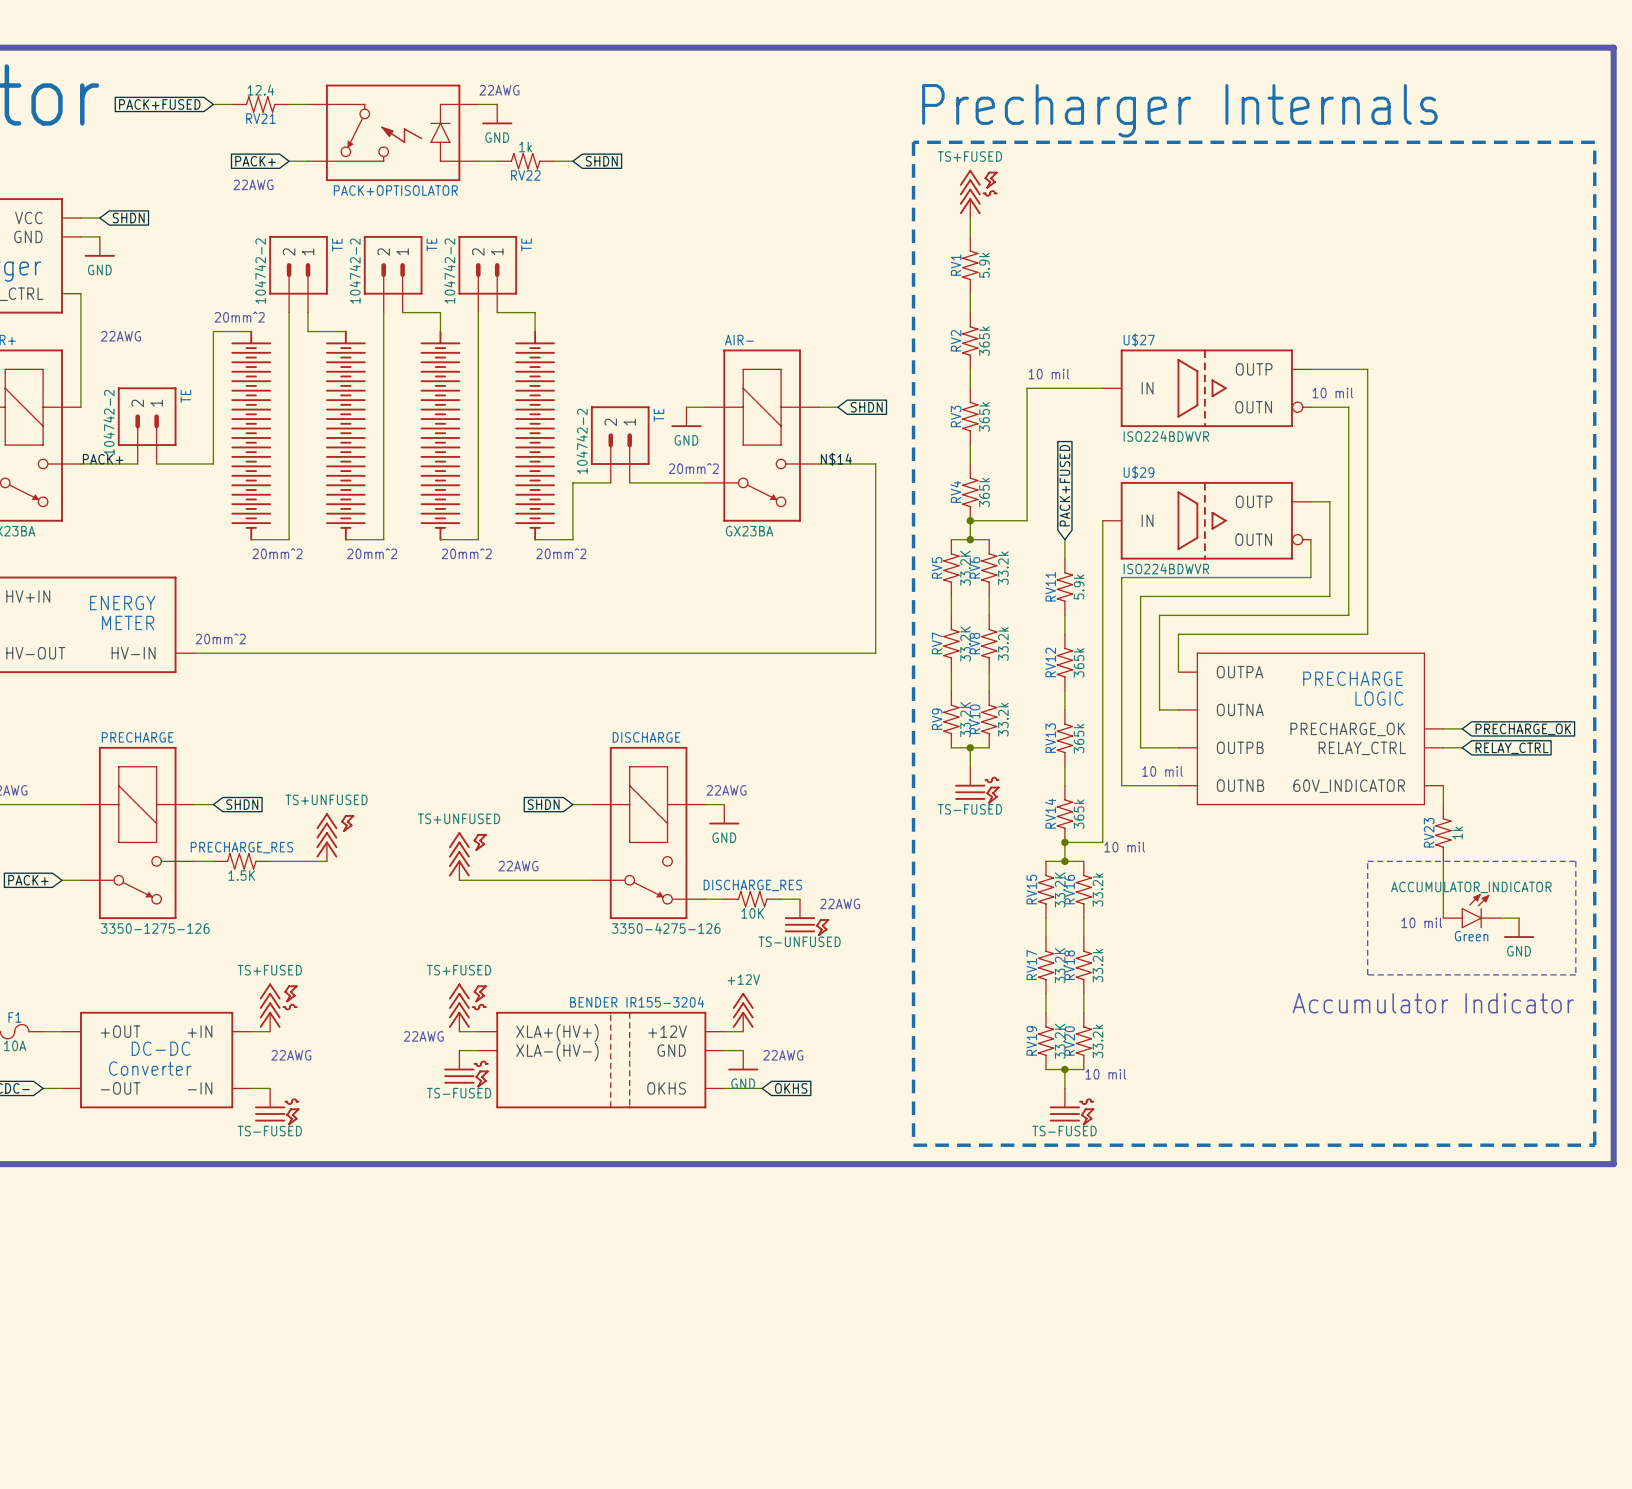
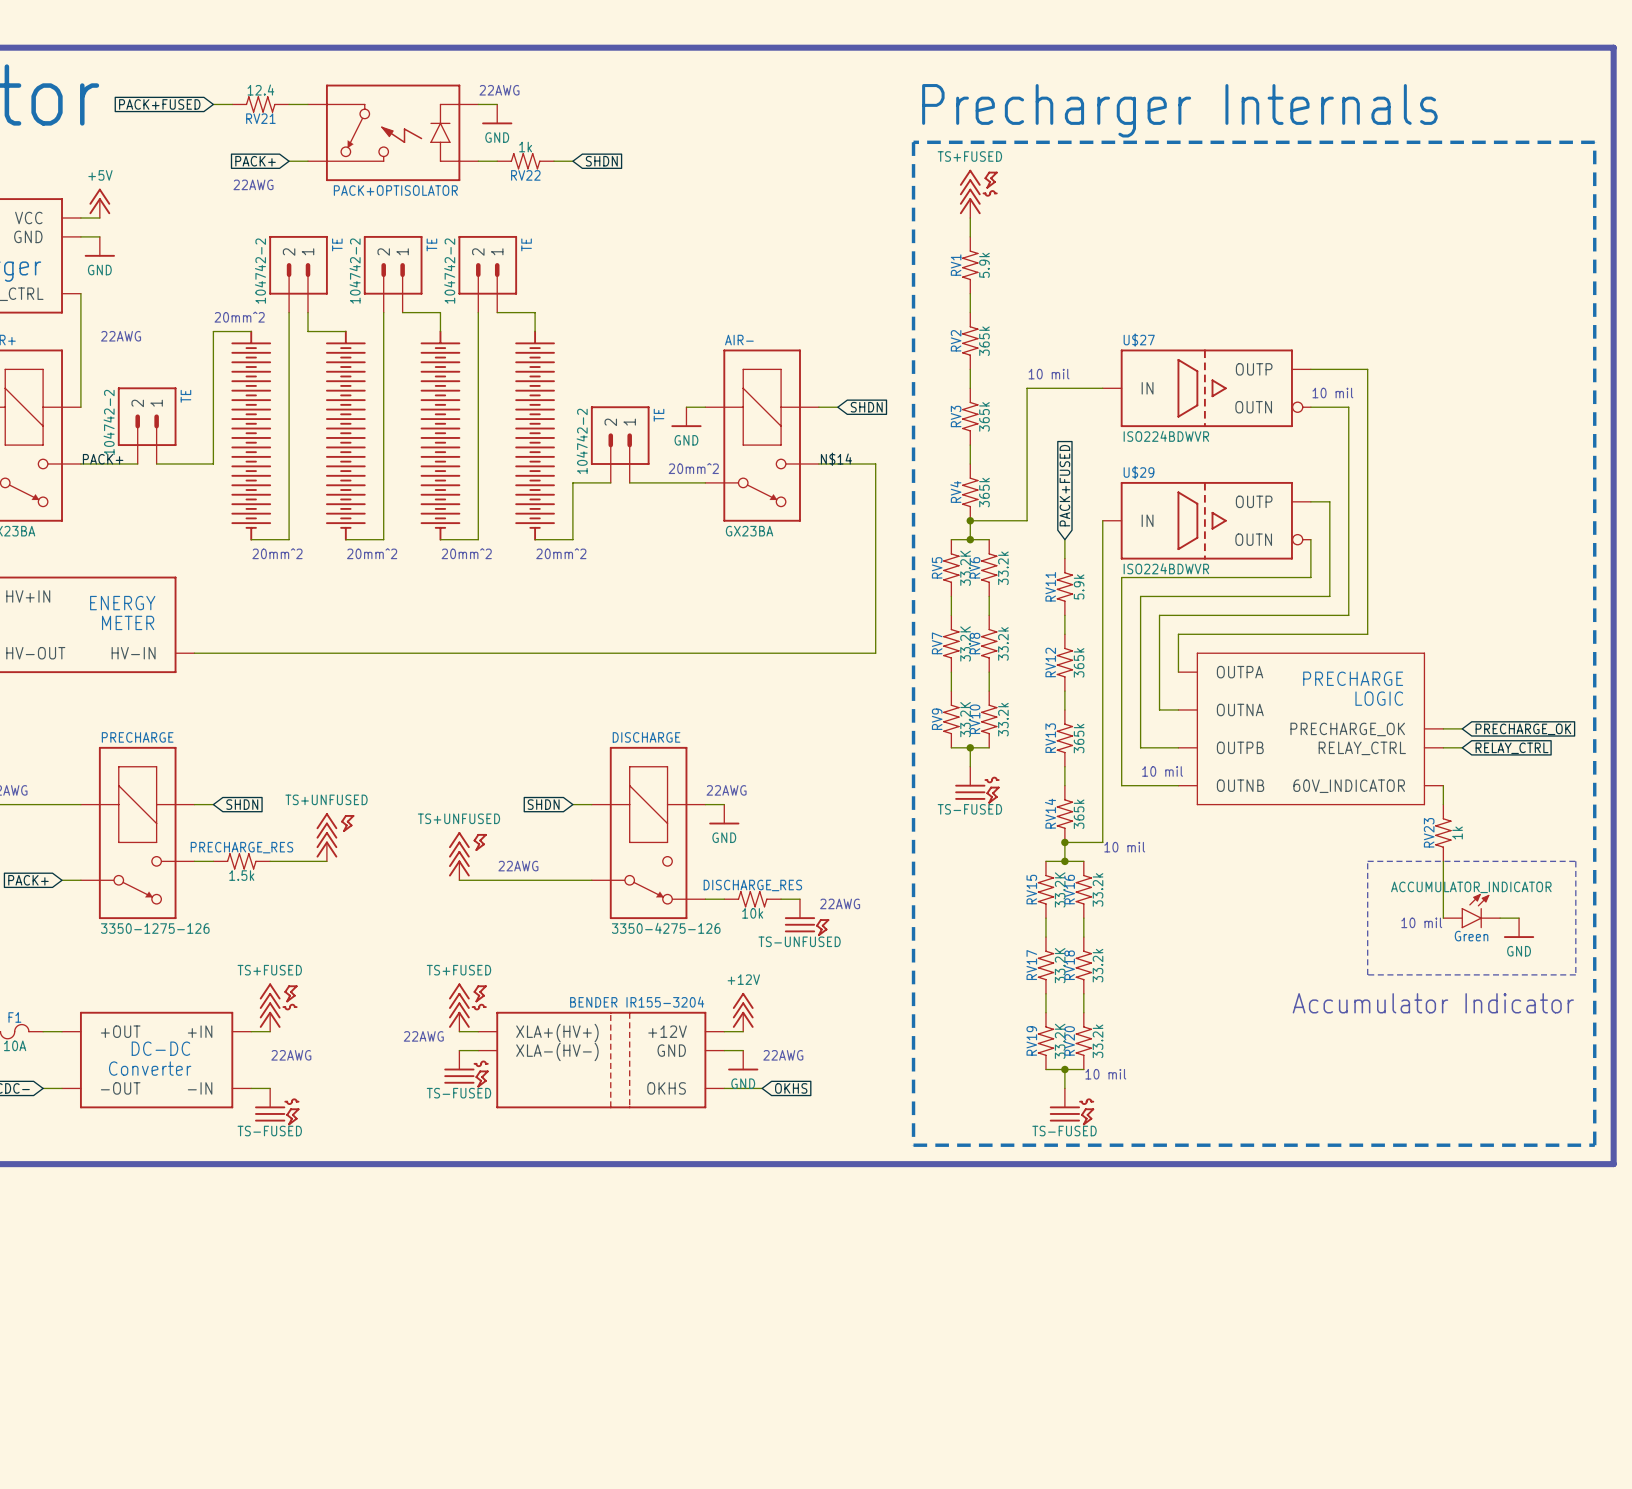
power symbol: none -> +5V (99, 203)
global label: SHDN (128, 218) -> none
text: 20mm^2 (220, 638) -> none
PRECHARGE_RES value: 1.5K (241, 875) -> 1.5k (241, 875)
DISCHARGE_RES value: 10K (752, 913) -> 10k (752, 913)

